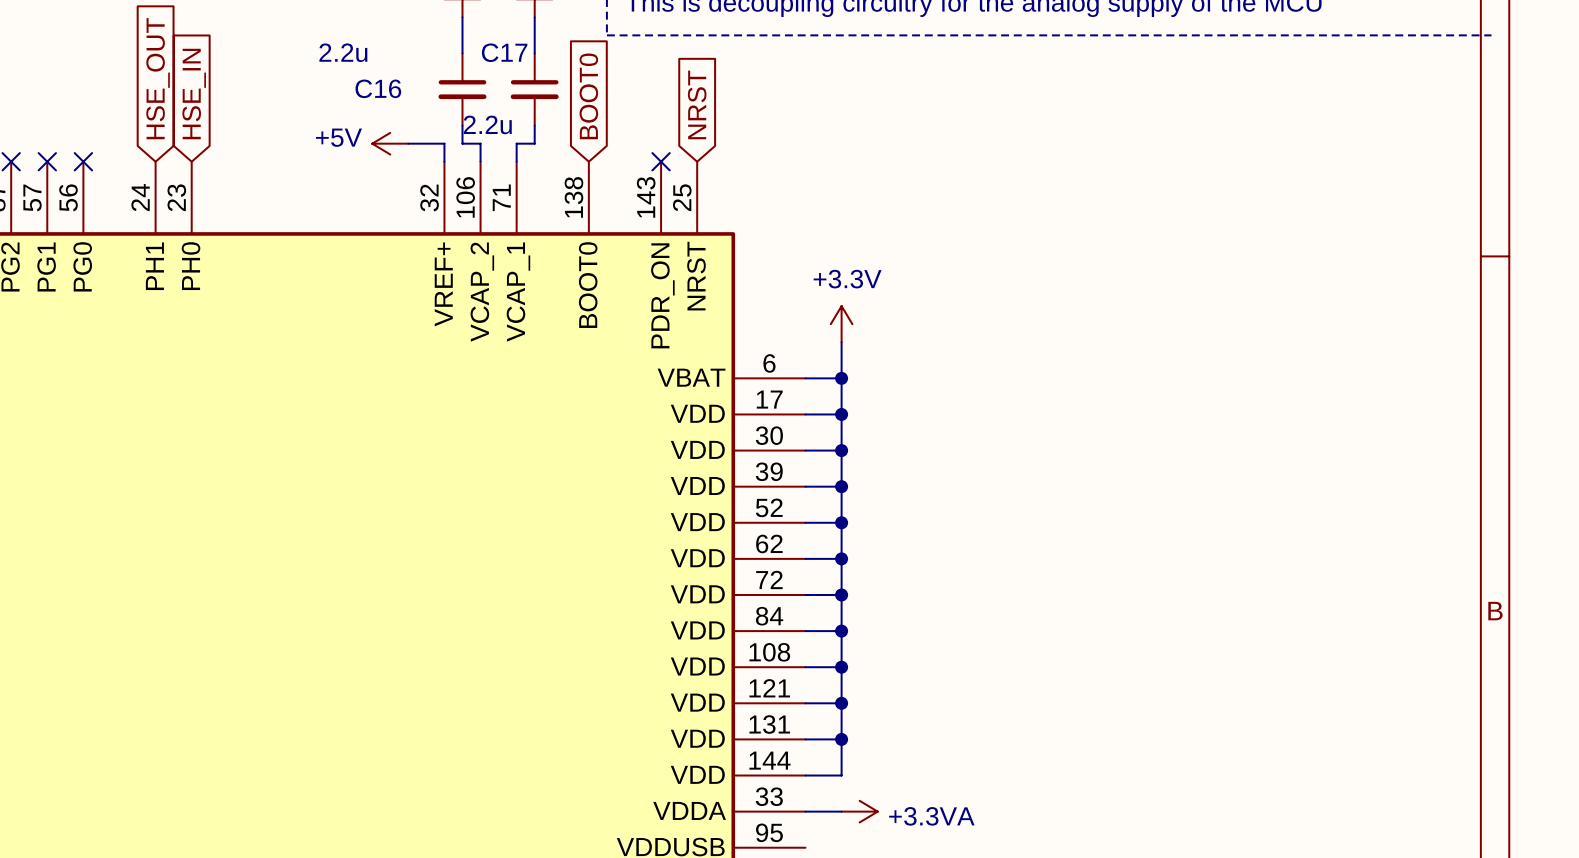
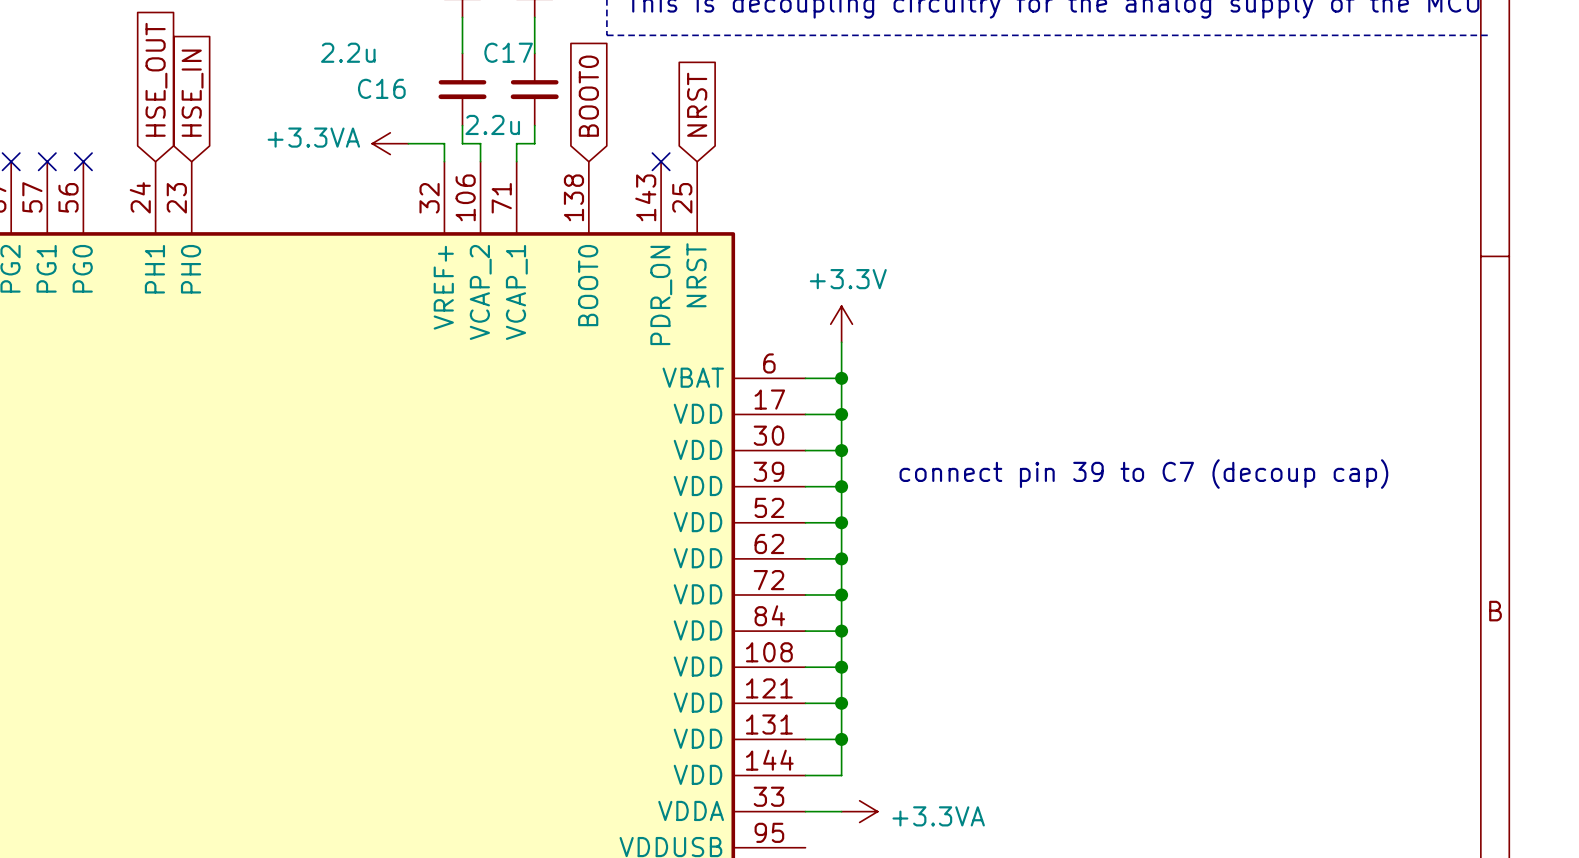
power symbol: +5V (390, 143) -> +3.3VA (390, 143)
text: none -> connect pin 39 to C7 (decoup cap) (1143, 474)

